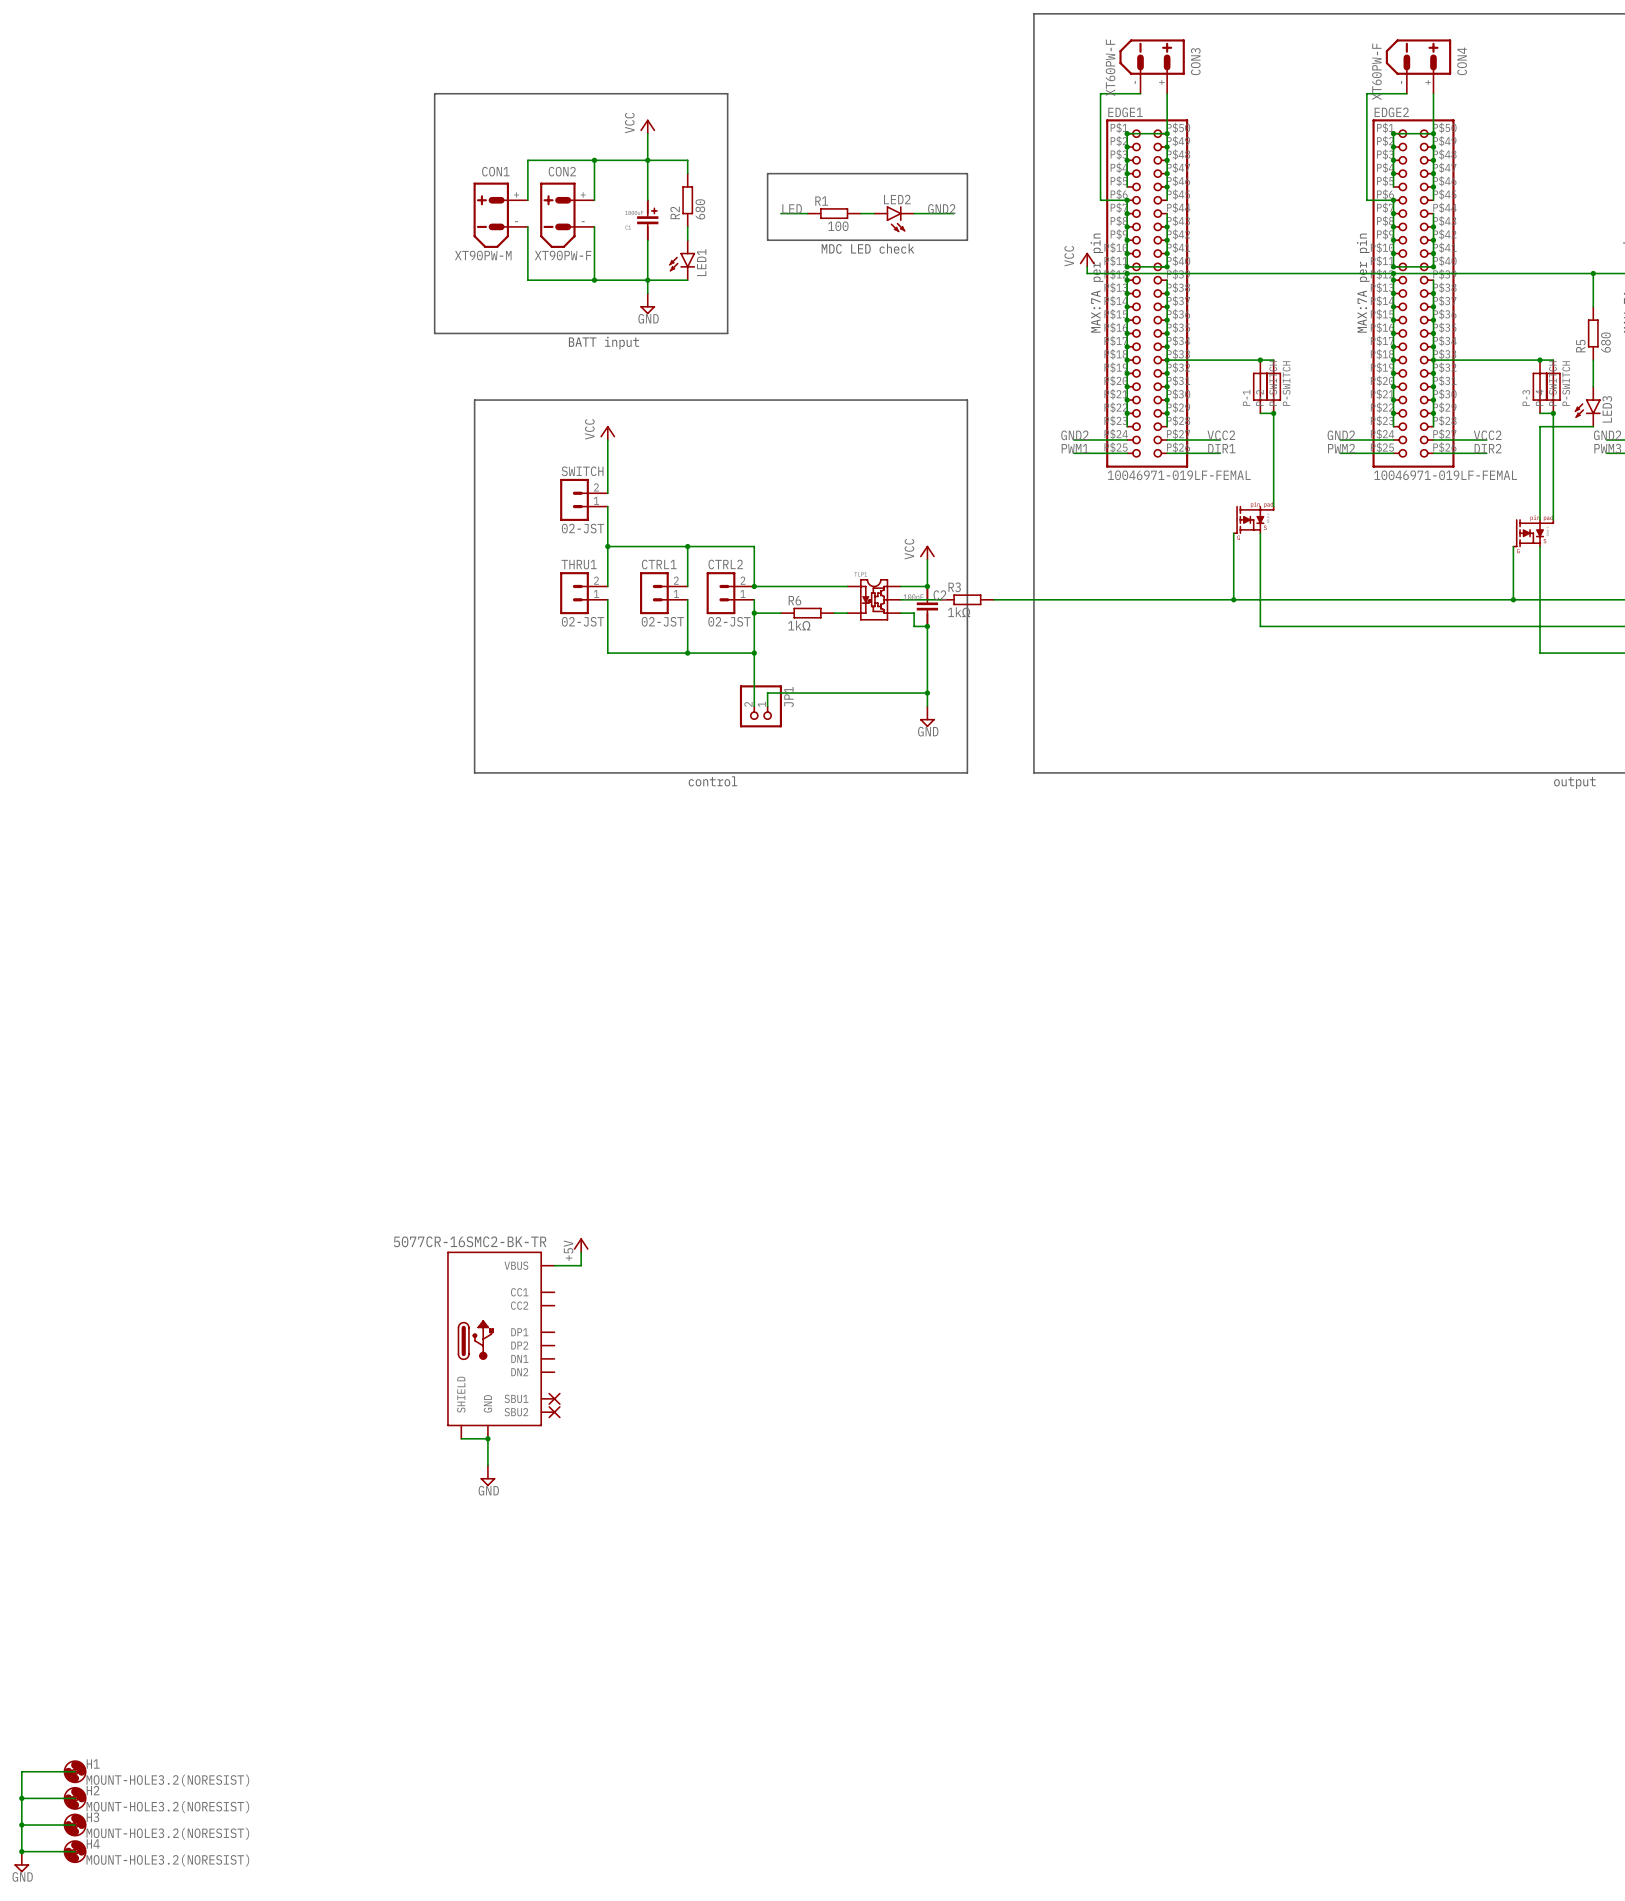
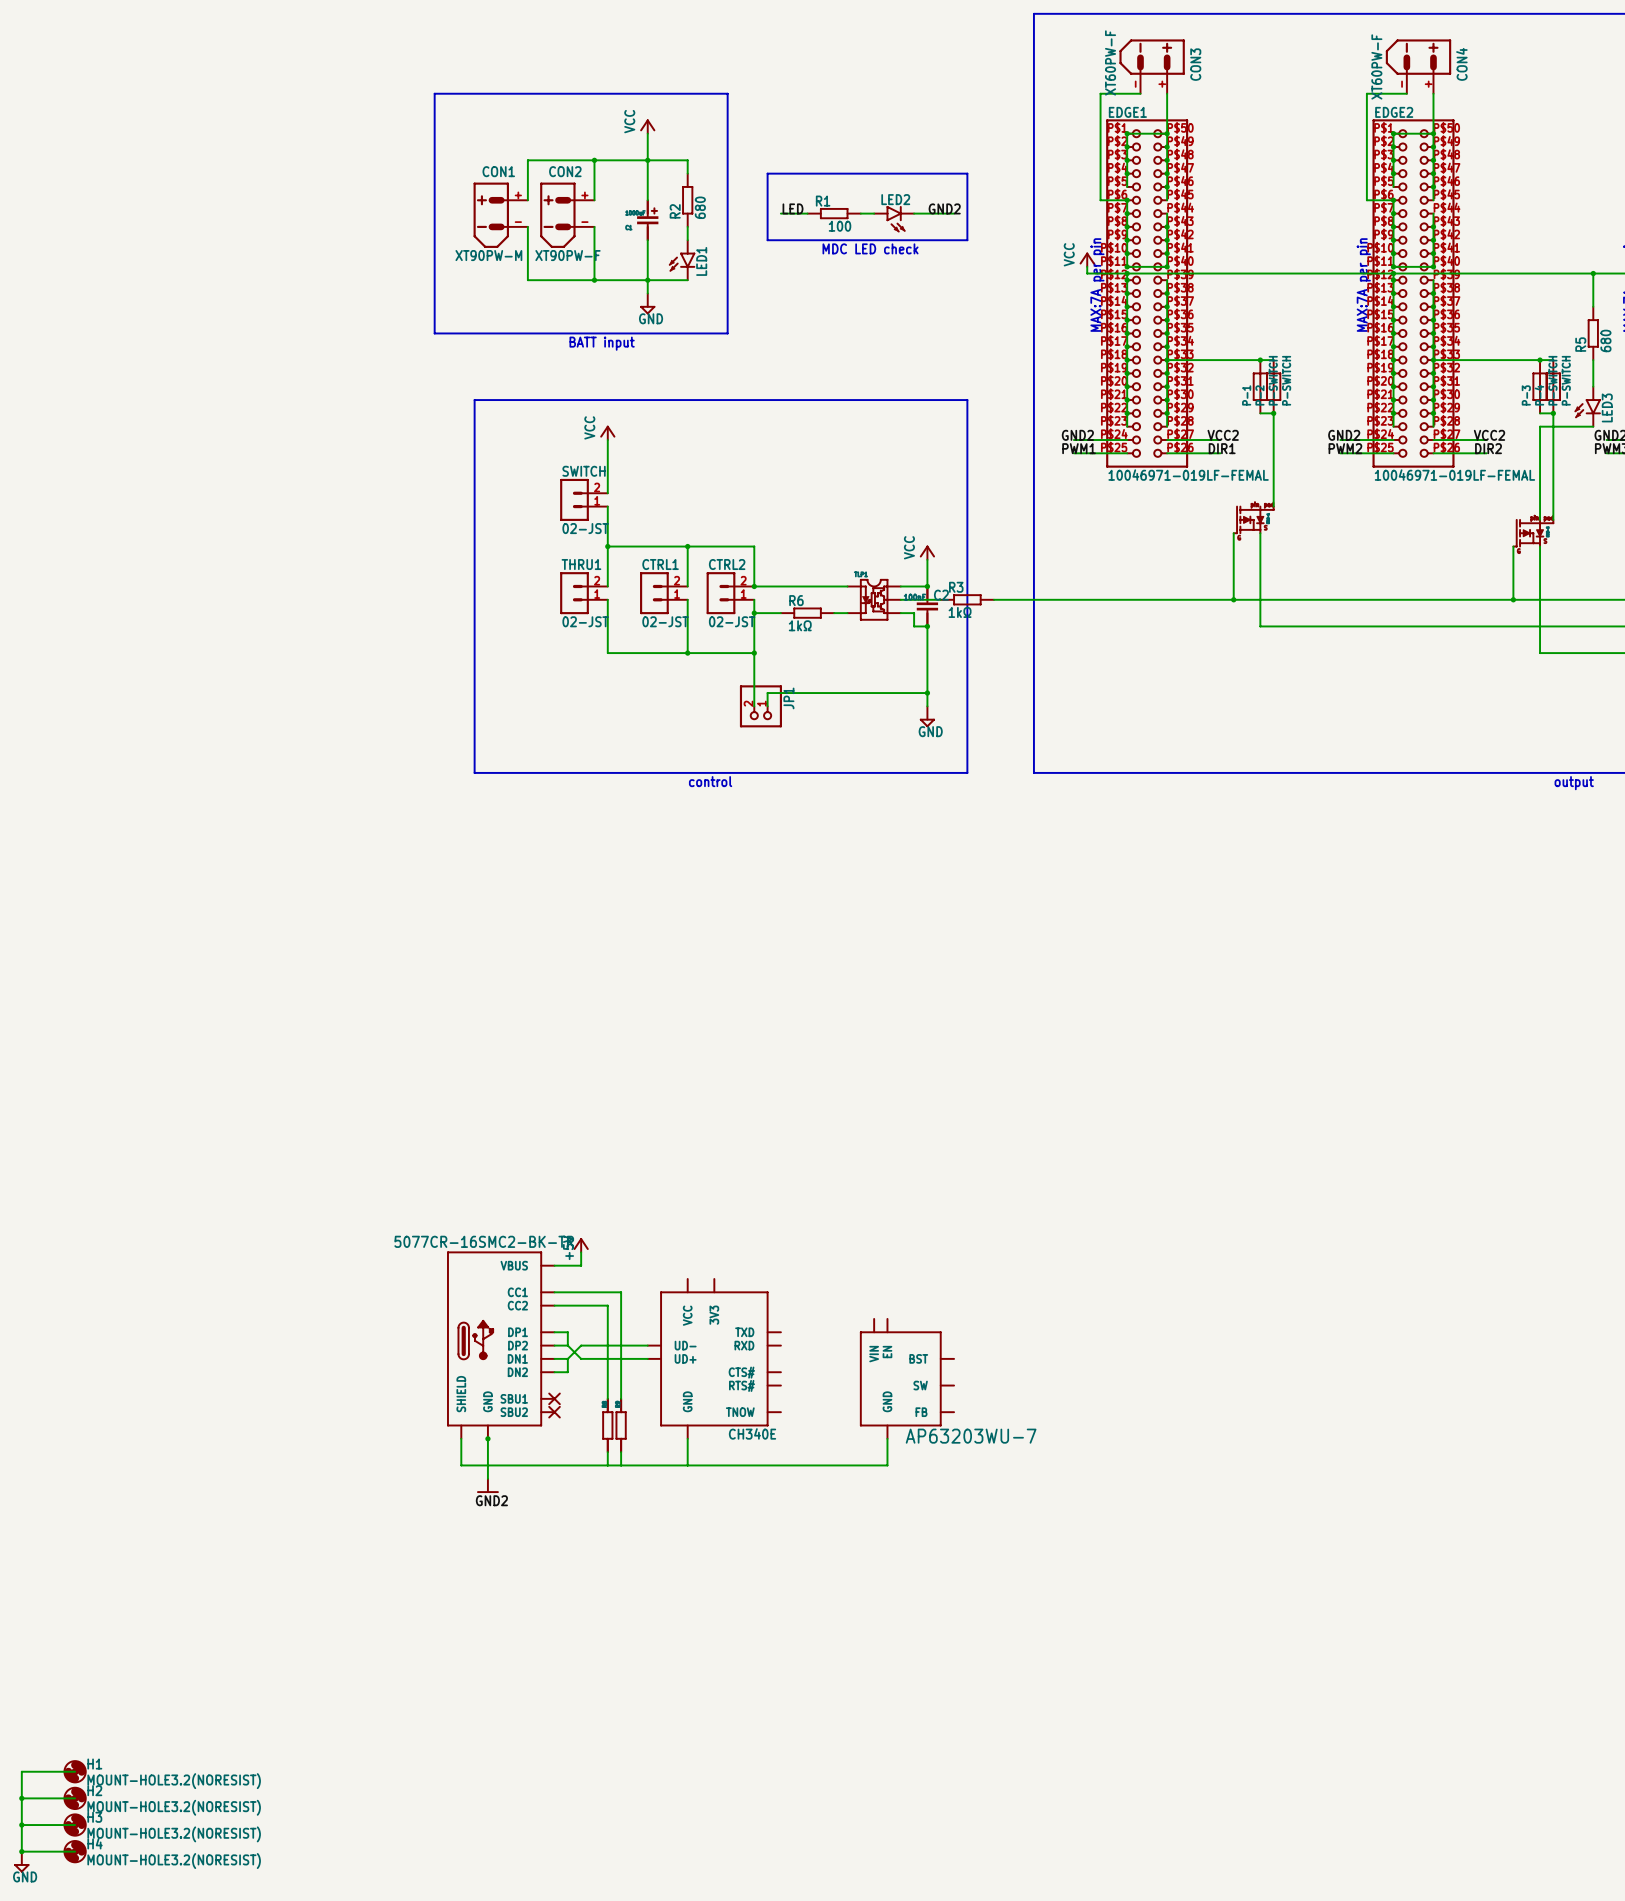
wire: none -> (554, 1292) (621, 1292) (621, 1398)
wire: none -> (554, 1305) (607, 1305) (607, 1398)
wire: none -> (554, 1332) (567, 1332) (567, 1345)
wire: none -> (554, 1345) (567, 1345)
wire: none -> (567, 1345) (581, 1358) (647, 1358)
wire: none -> (647, 1345) (581, 1345) (567, 1358)
wire: none -> (554, 1358) (567, 1358)
wire: none -> (567, 1358) (567, 1372) (554, 1372)
part: none -> CH340E (714, 1358)
part: none -> AP63203WU-7 (907, 1378)
part: none -> (607, 1425)
part: none -> (621, 1425)
wire: (461, 1438) (487, 1438) -> (461, 1438) (461, 1465) (887, 1465) (887, 1438)
wire: none -> (687, 1438) (687, 1465)
wire: none -> (607, 1452) (607, 1465)
wire: none -> (621, 1452) (621, 1465)
power symbol: GND (487, 1475) -> none
power symbol: none -> (487, 1485)
label: none -> GND2 (491, 1500)

